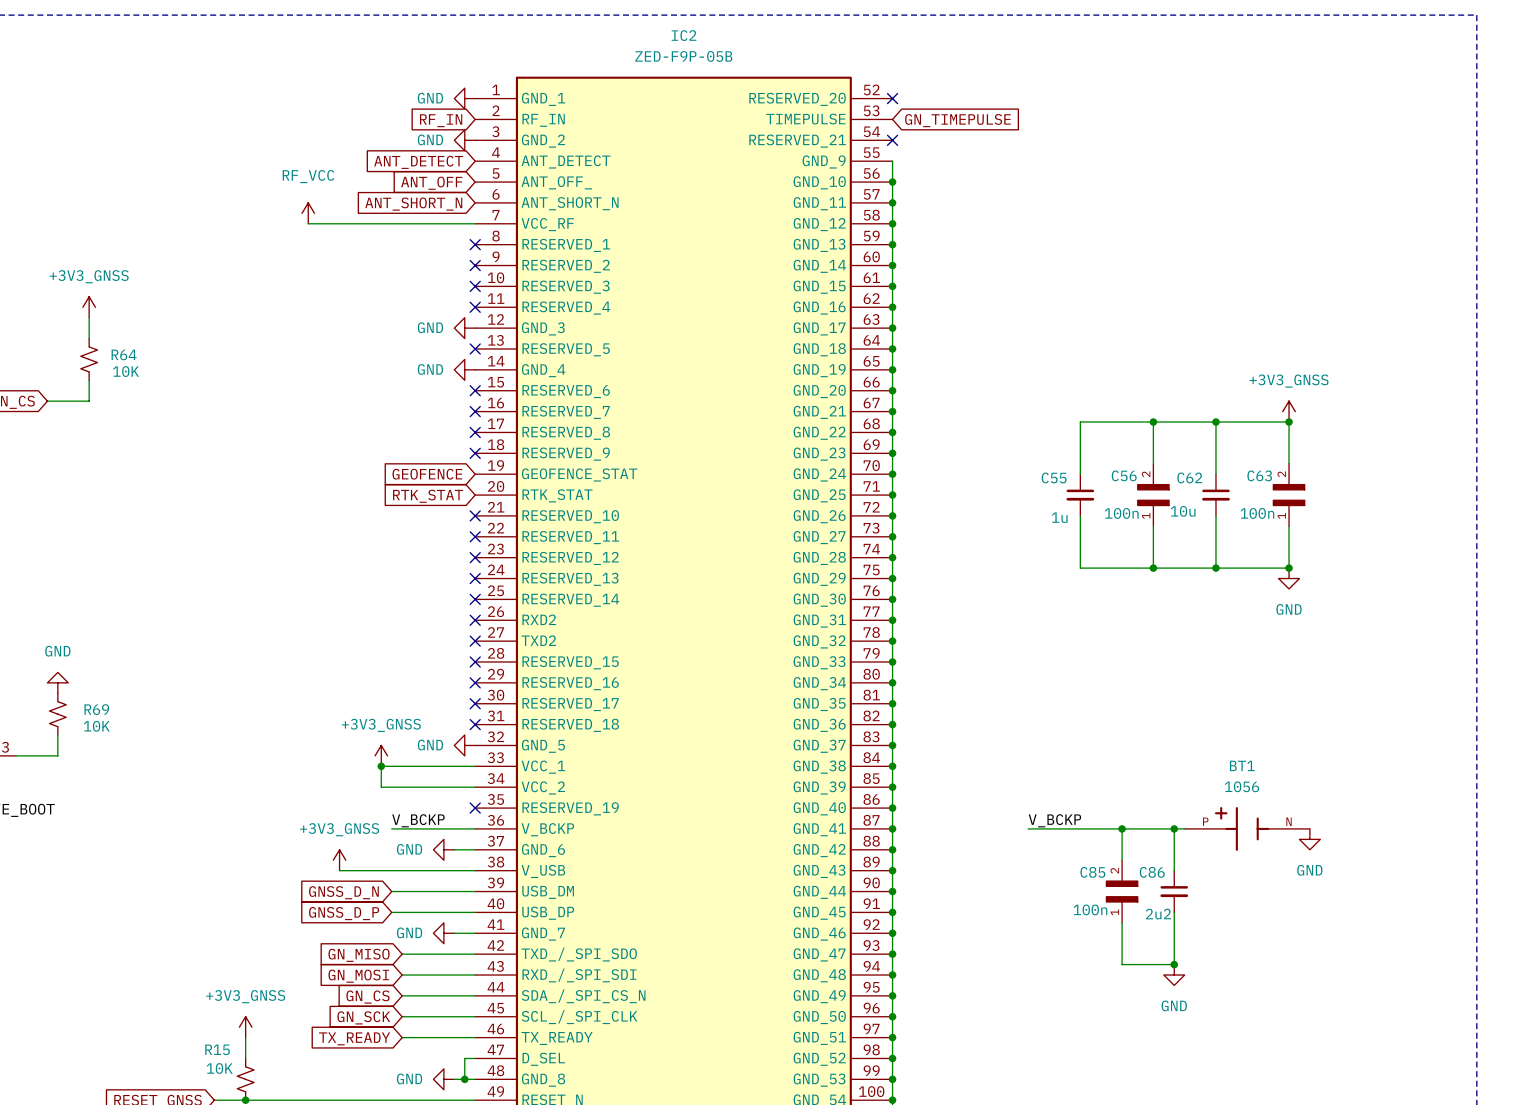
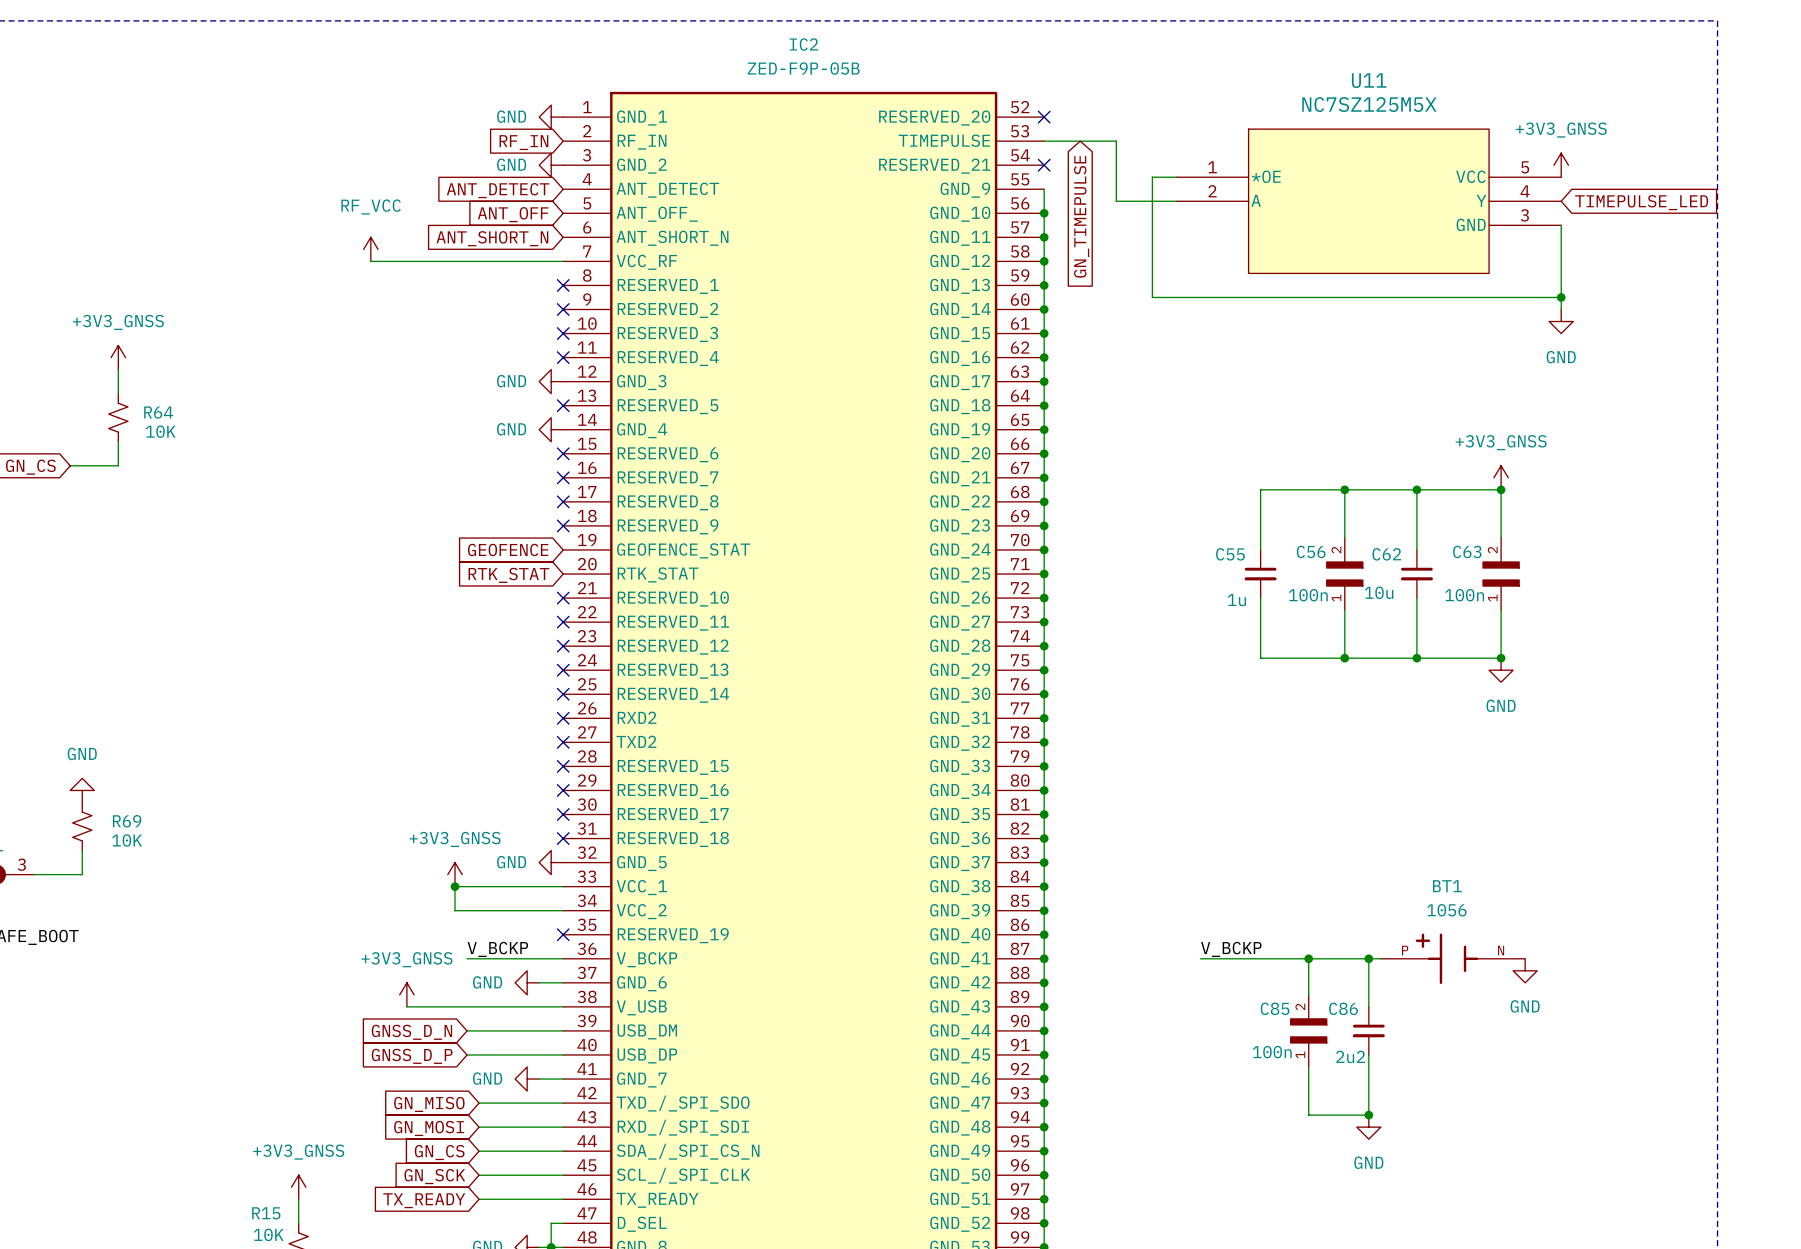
wire: none -> (1044, 141) (1116, 141) (1116, 201) (1176, 201)
global label rotation: 0° (957, 120) -> 90° clockwise (1081, 216)
power symbol: none -> +3V3_GNSS (1561, 165)
wire: none -> (1176, 177) (1152, 177) (1152, 297) (1561, 297)
U11: none -> NC7SZ125M5X (1368, 201)
global label: none -> TIMEPULSE_LED (1641, 202)
wire: none -> (1561, 225) (1561, 309)
junction: none -> (1561, 297)
power symbol: none -> GND (1561, 321)

